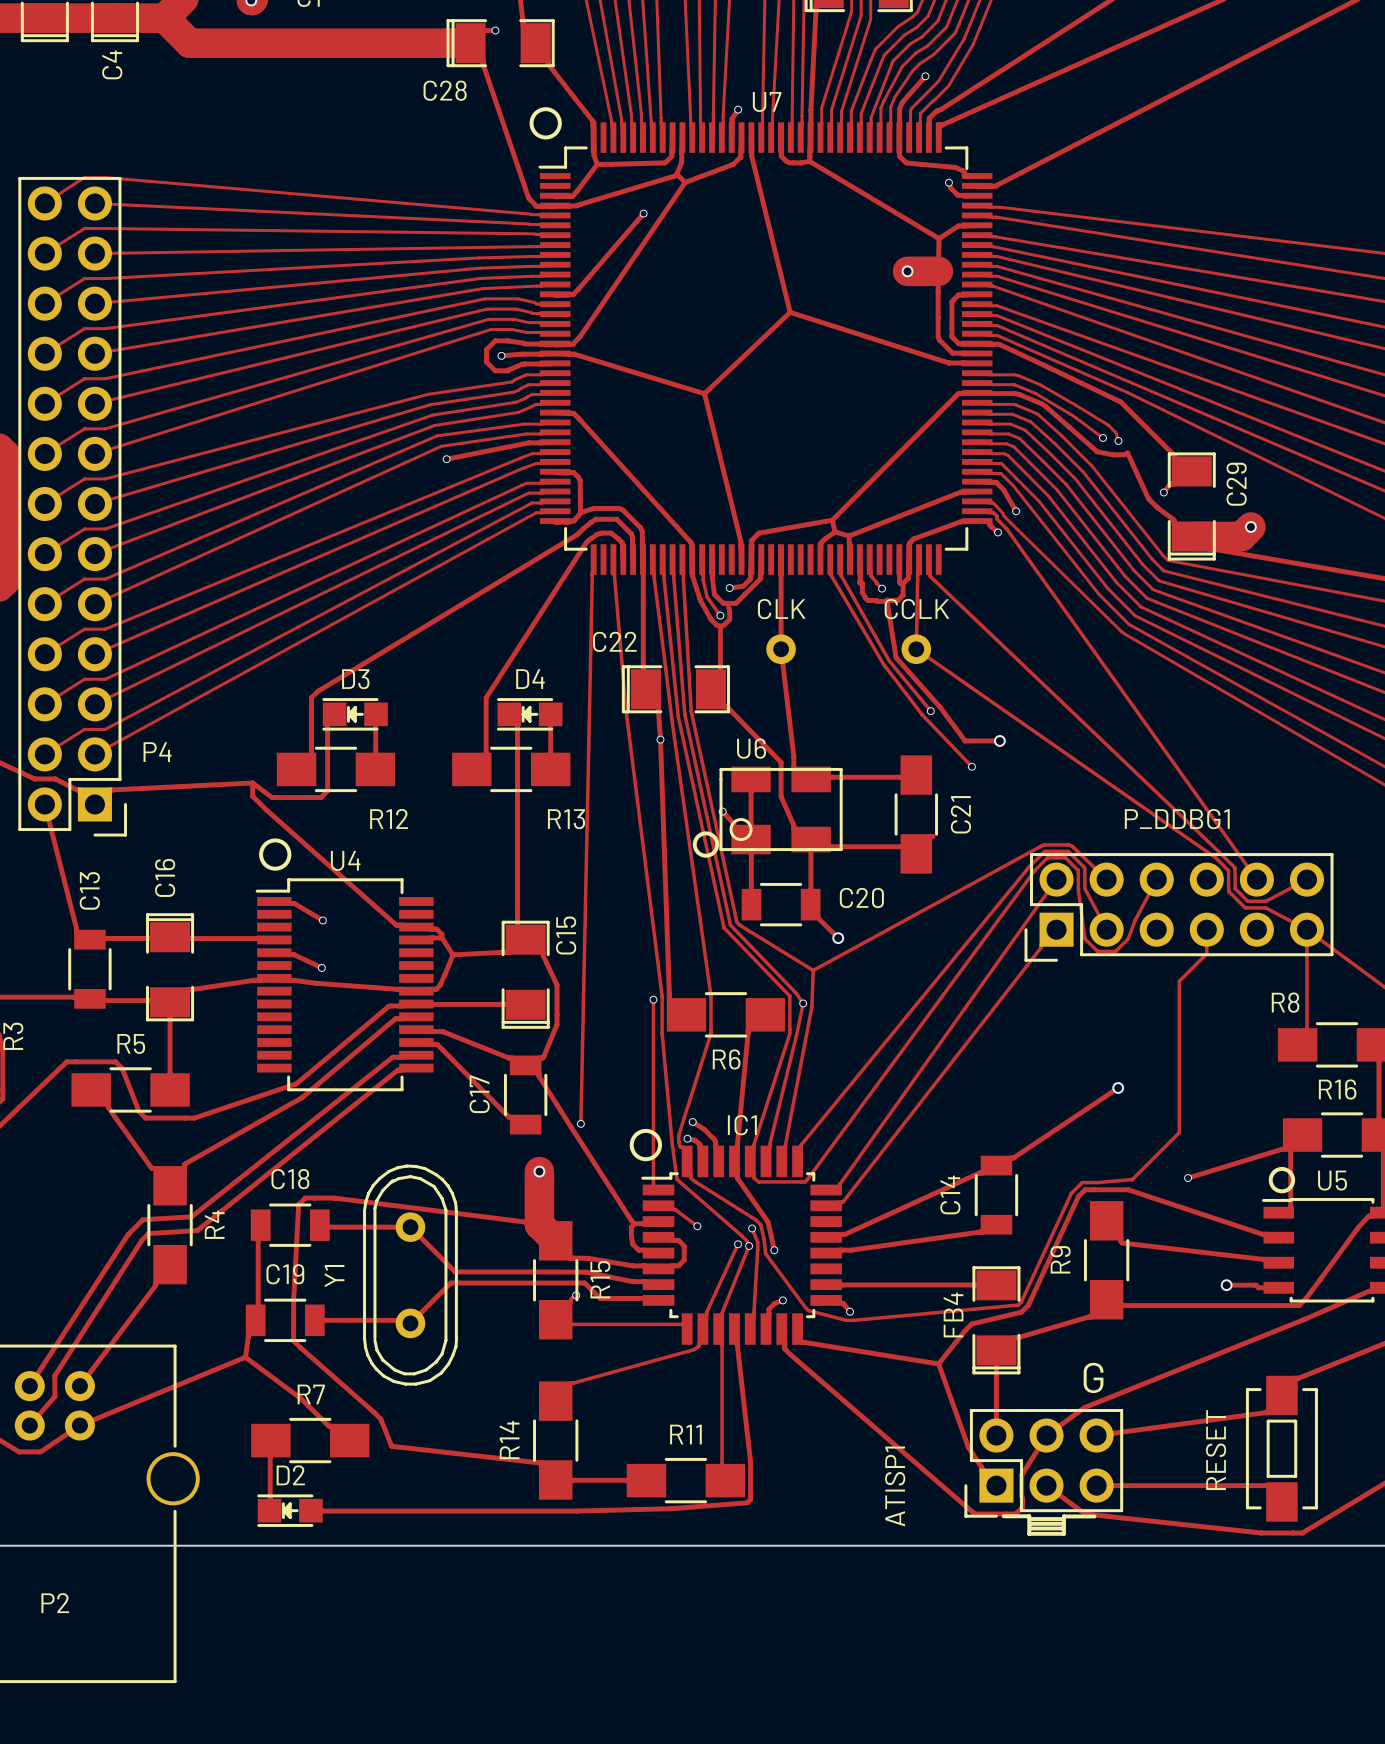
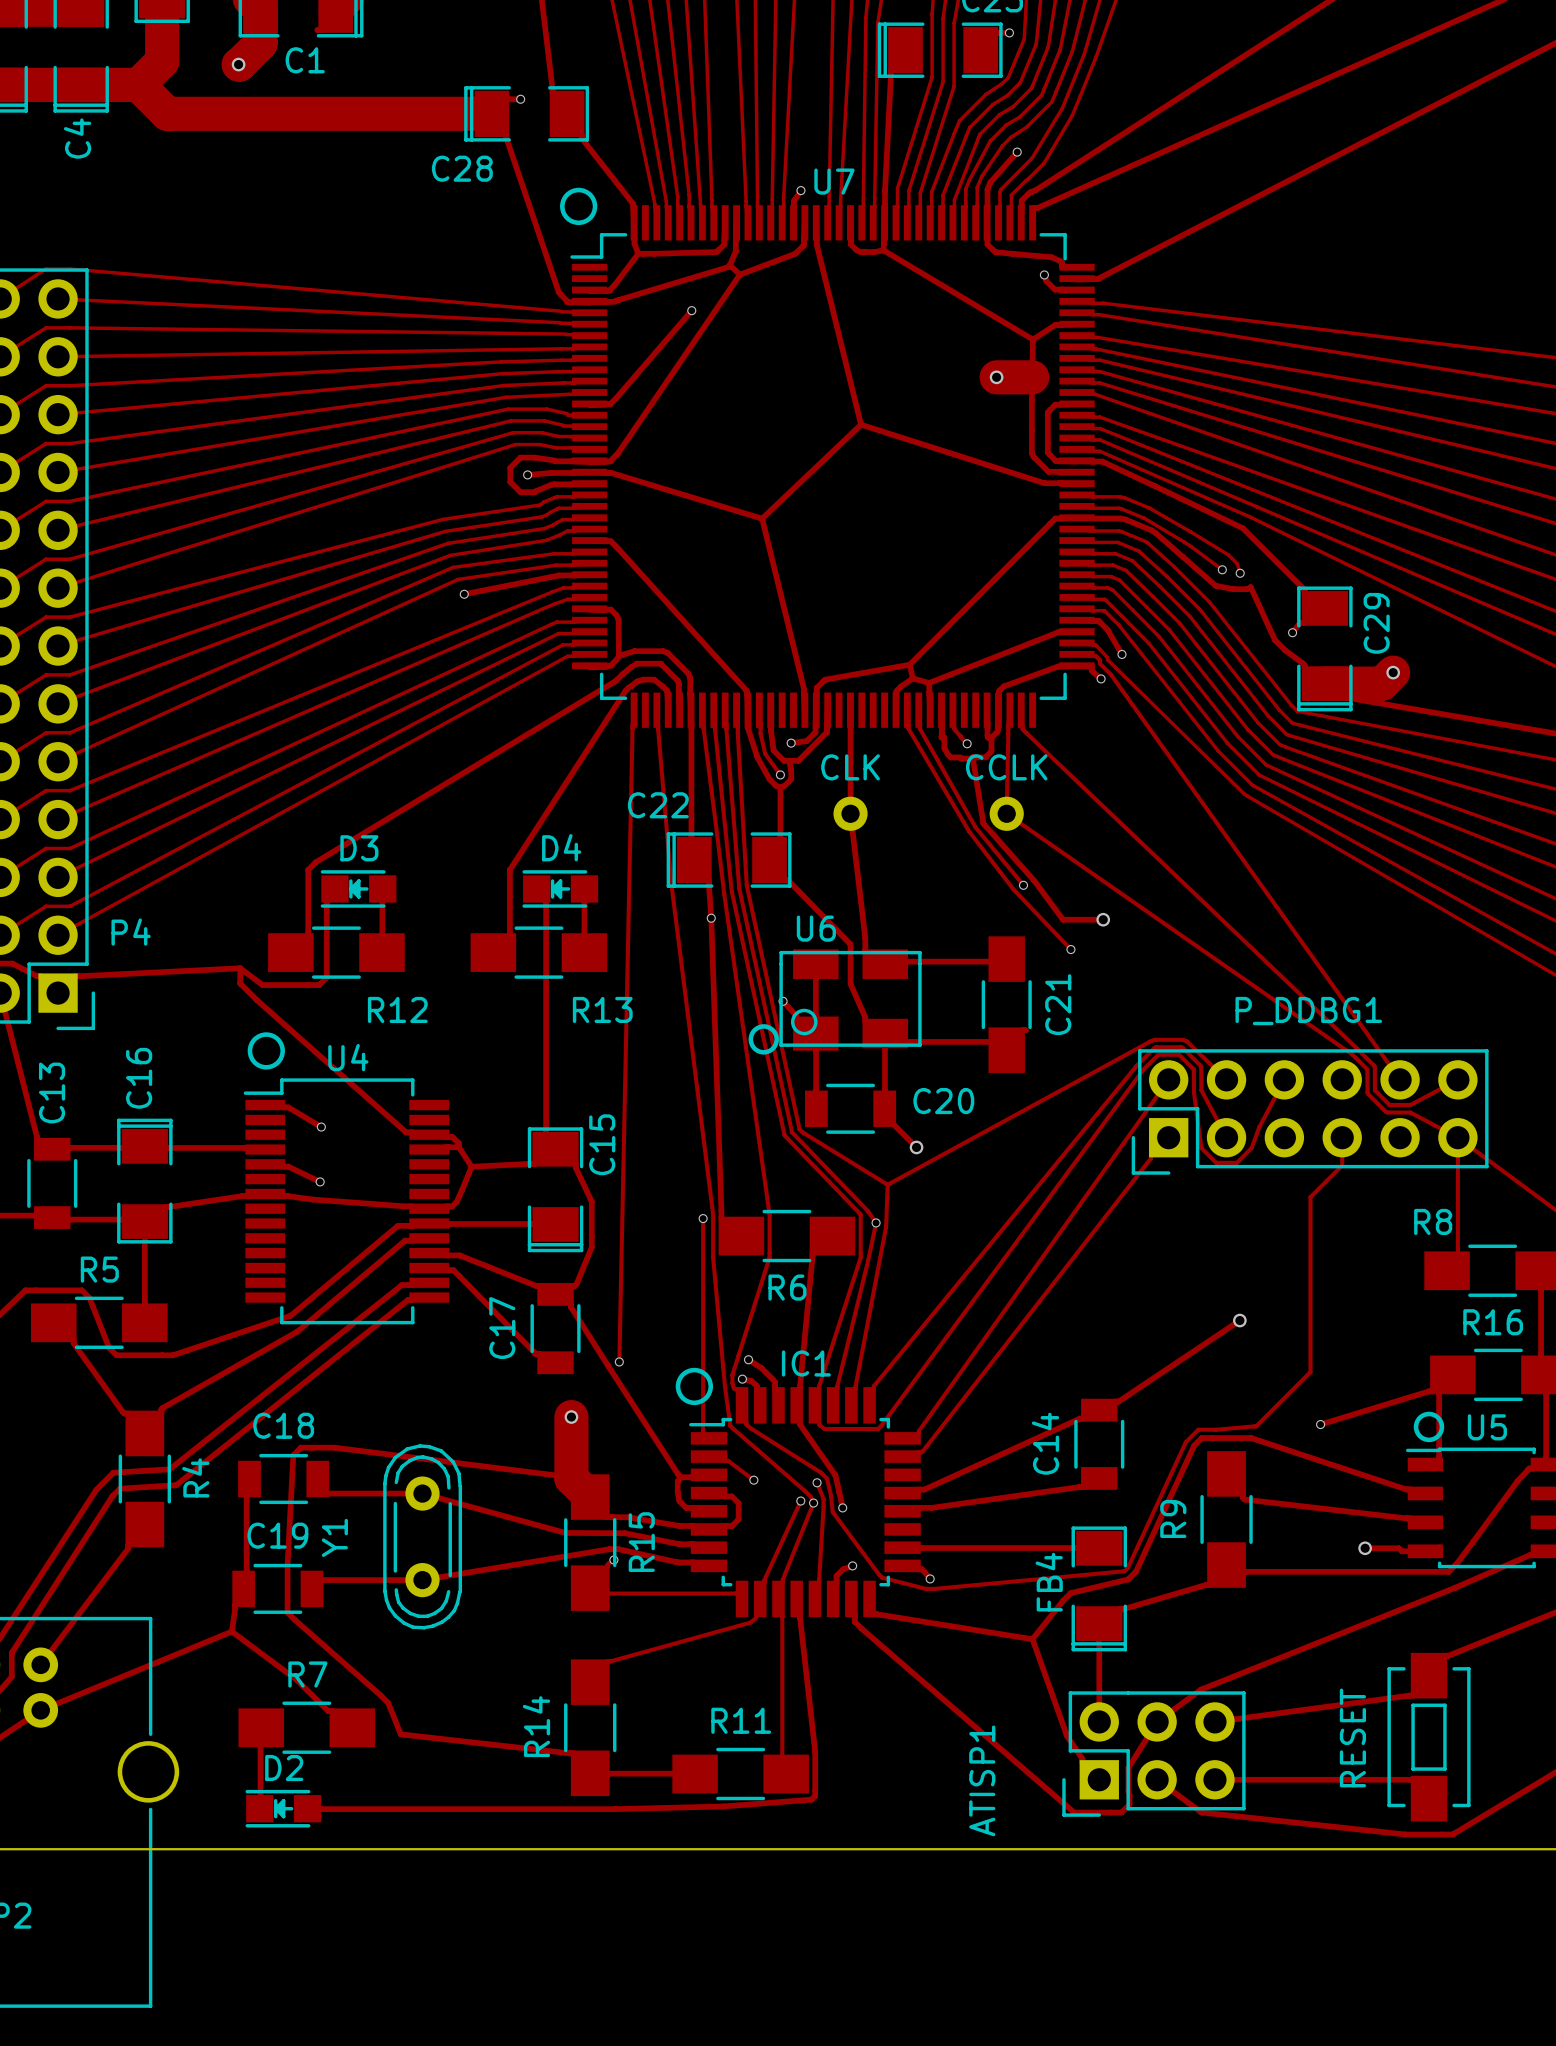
Y1 footprint: [363, 1164, 459, 1386] -> [383, 1444, 463, 1630]
track: (319, 1225) (321, 1227) (410, 1227) -> none
track: (408, 1225) (455, 1271) (534, 1271) -> (326, 1493) (422, 1493) (565, 1532)
track: none -> (693, 1562) (675, 1561) (618, 1549) (609, 1549) (422, 1580) (320, 1580)
track: (658, 1300) (656, 1298) (600, 1298) (584, 1283) (450, 1283) (410, 1323) (407, 1320) (314, 1320) (317, 1323) -> none
text: G (1093, 1377) -> none
line: (1003, 1516) (1029, 1516) (1029, 1533) (1063, 1533) (1063, 1516) (1094, 1516) -> none
line: (1030, 1519) (1062, 1519) -> none
line: (1031, 1523) (1061, 1523) -> none
line: (1062, 1528) (1029, 1528) -> none

